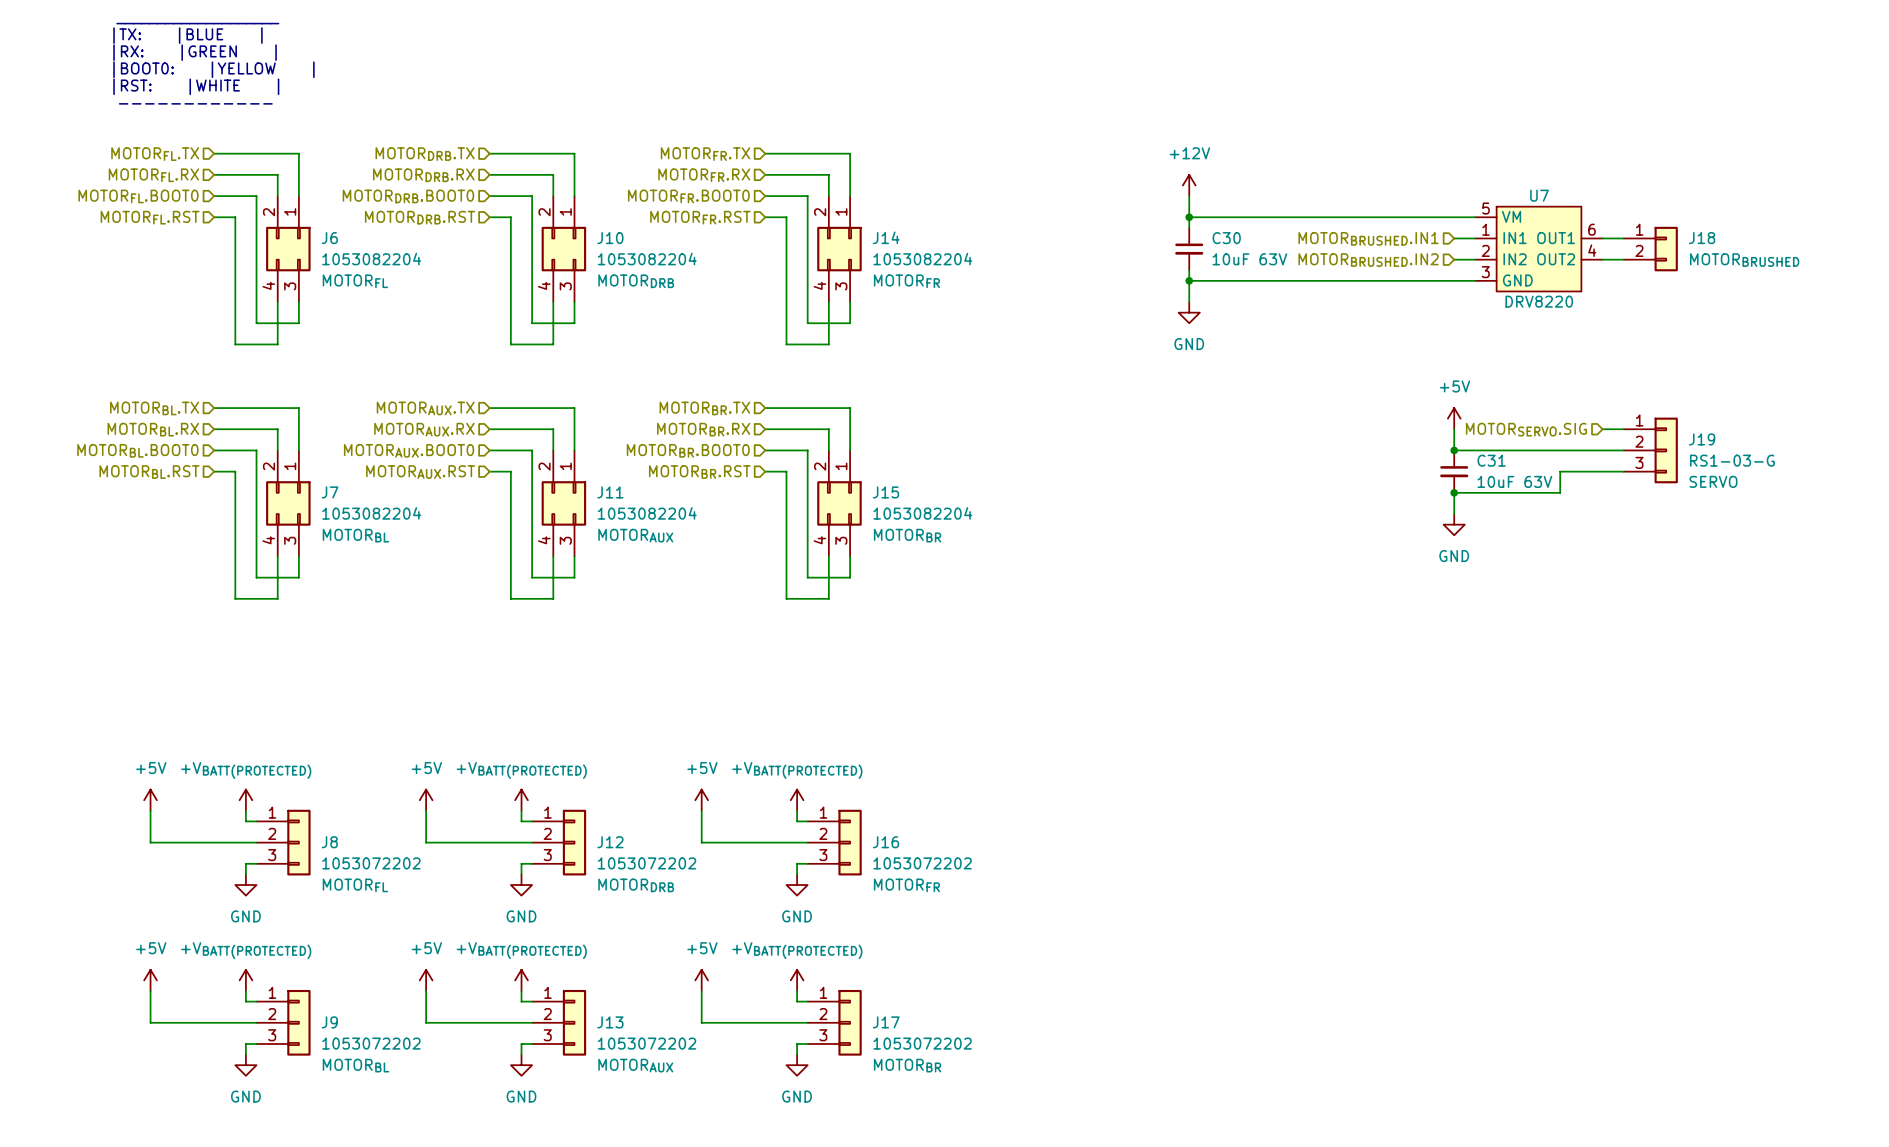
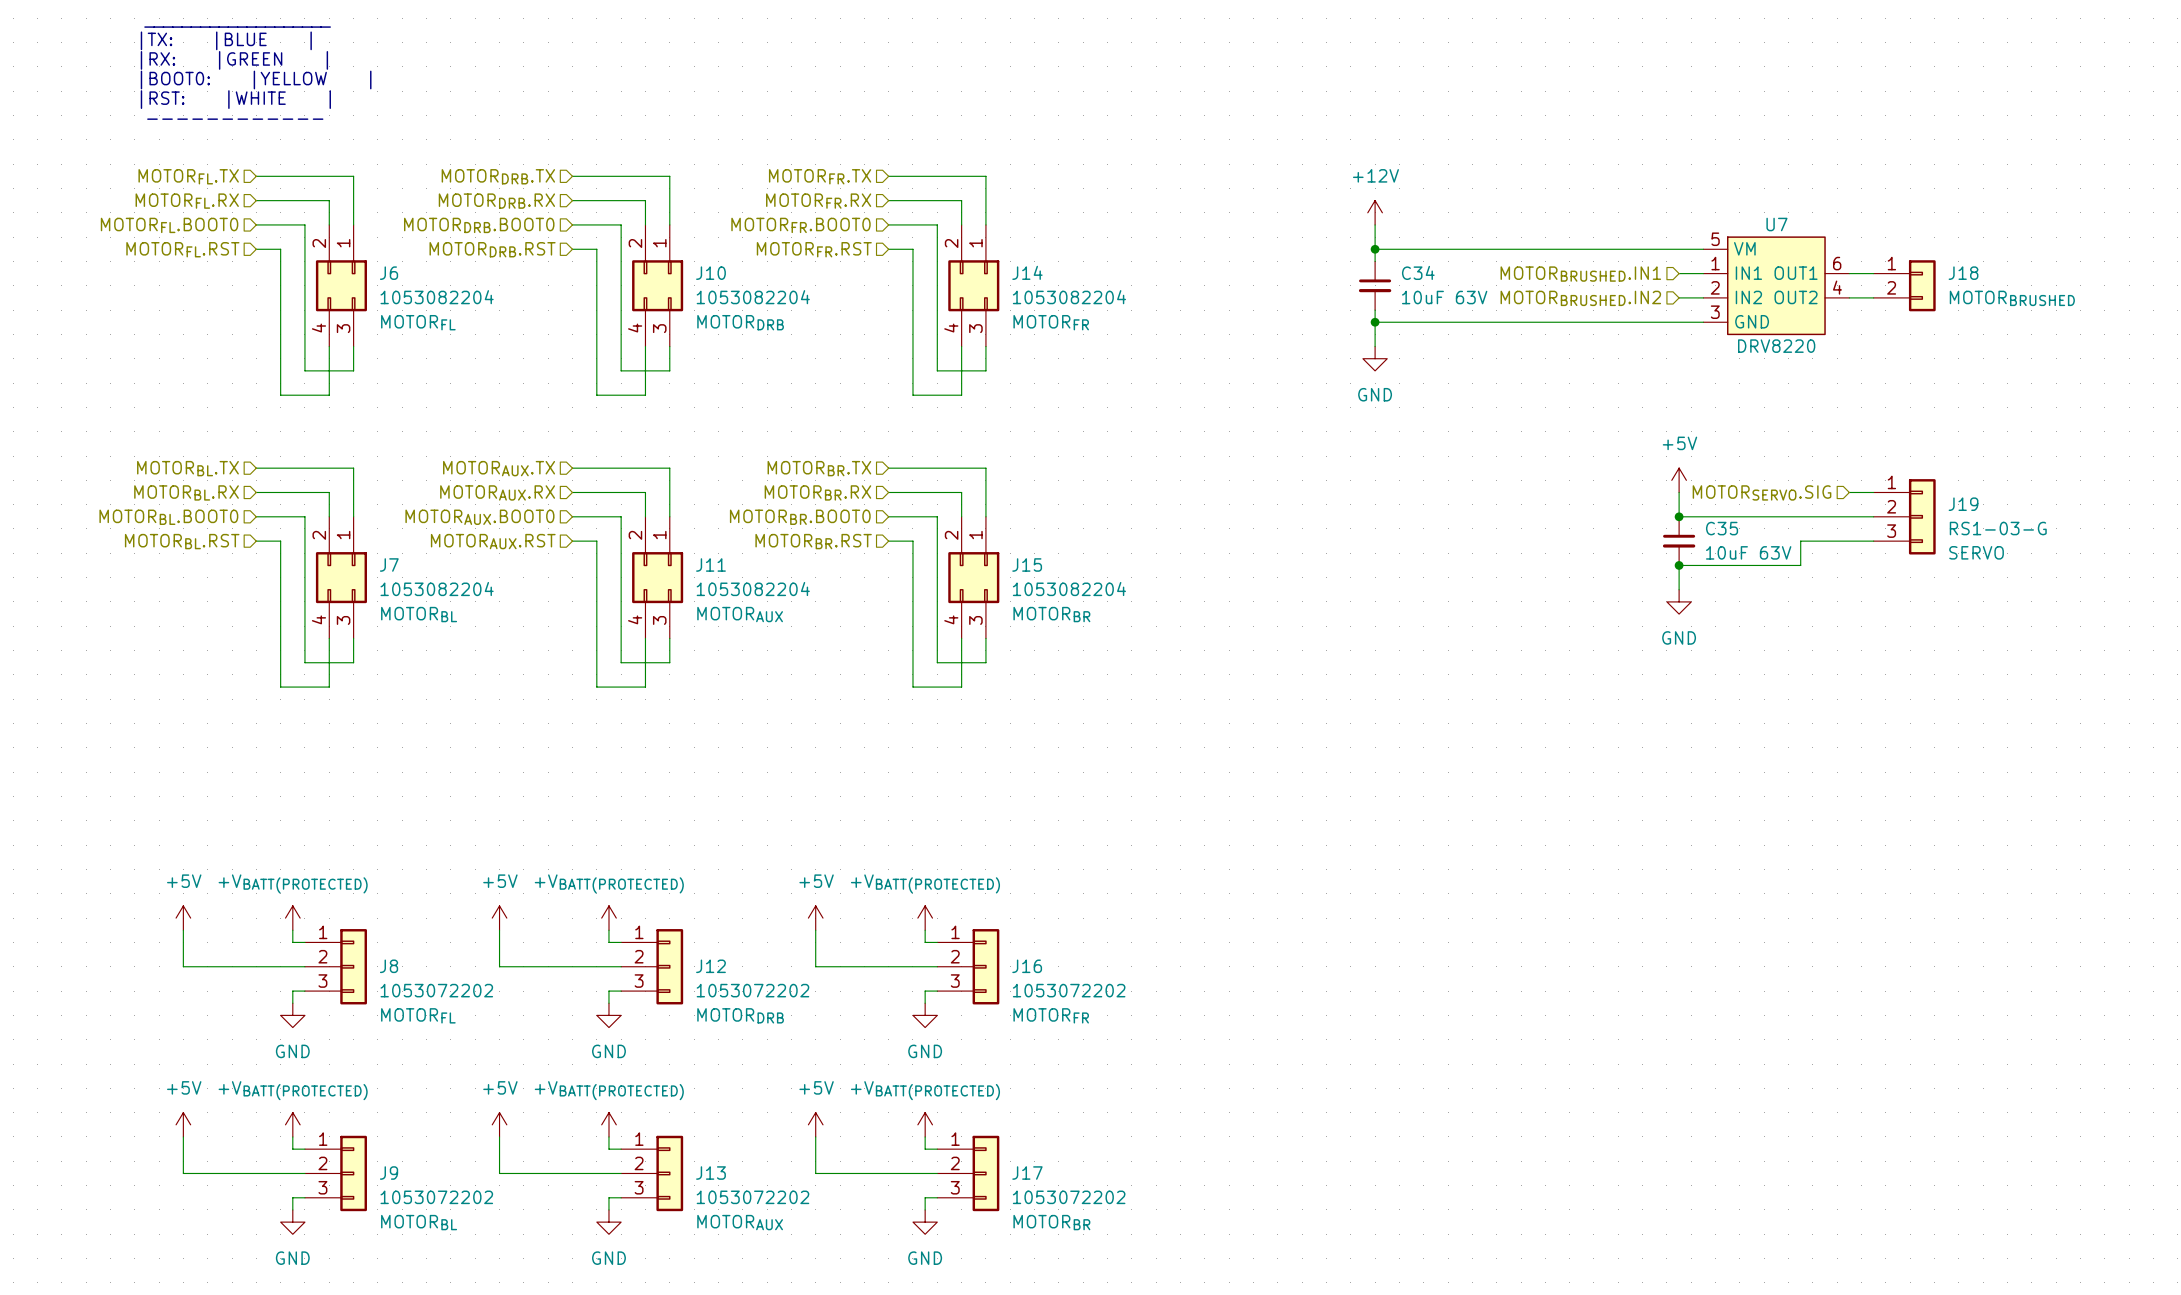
C30 name: C30 (1226, 238) -> C34 (1418, 272)
C31 name: C31 (1491, 460) -> C35 (1722, 528)

